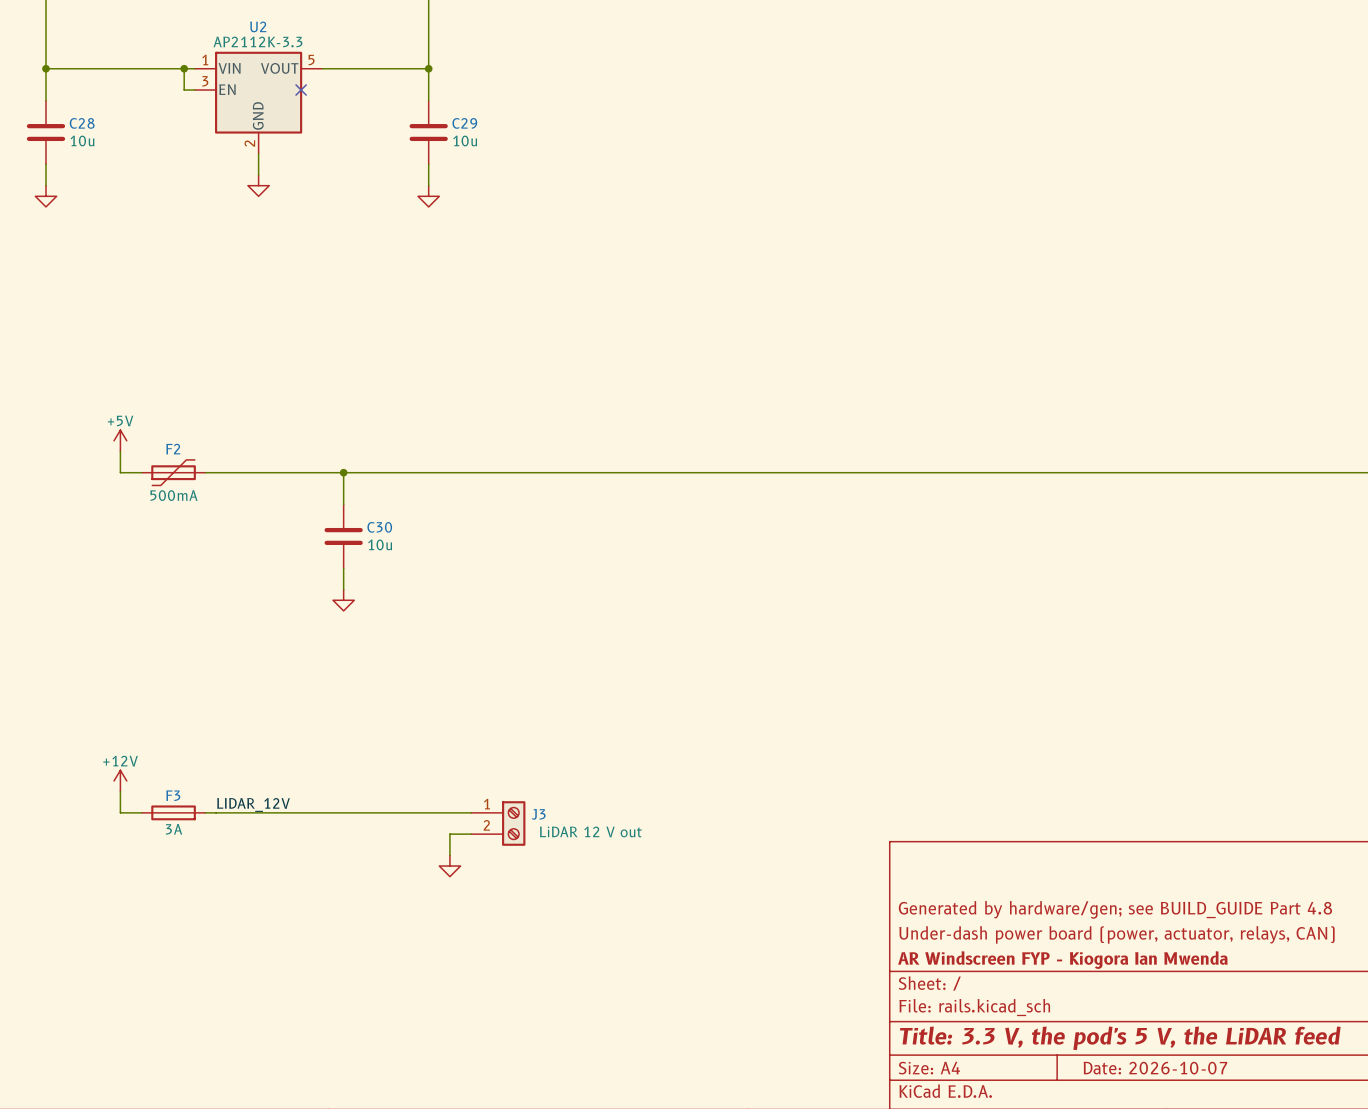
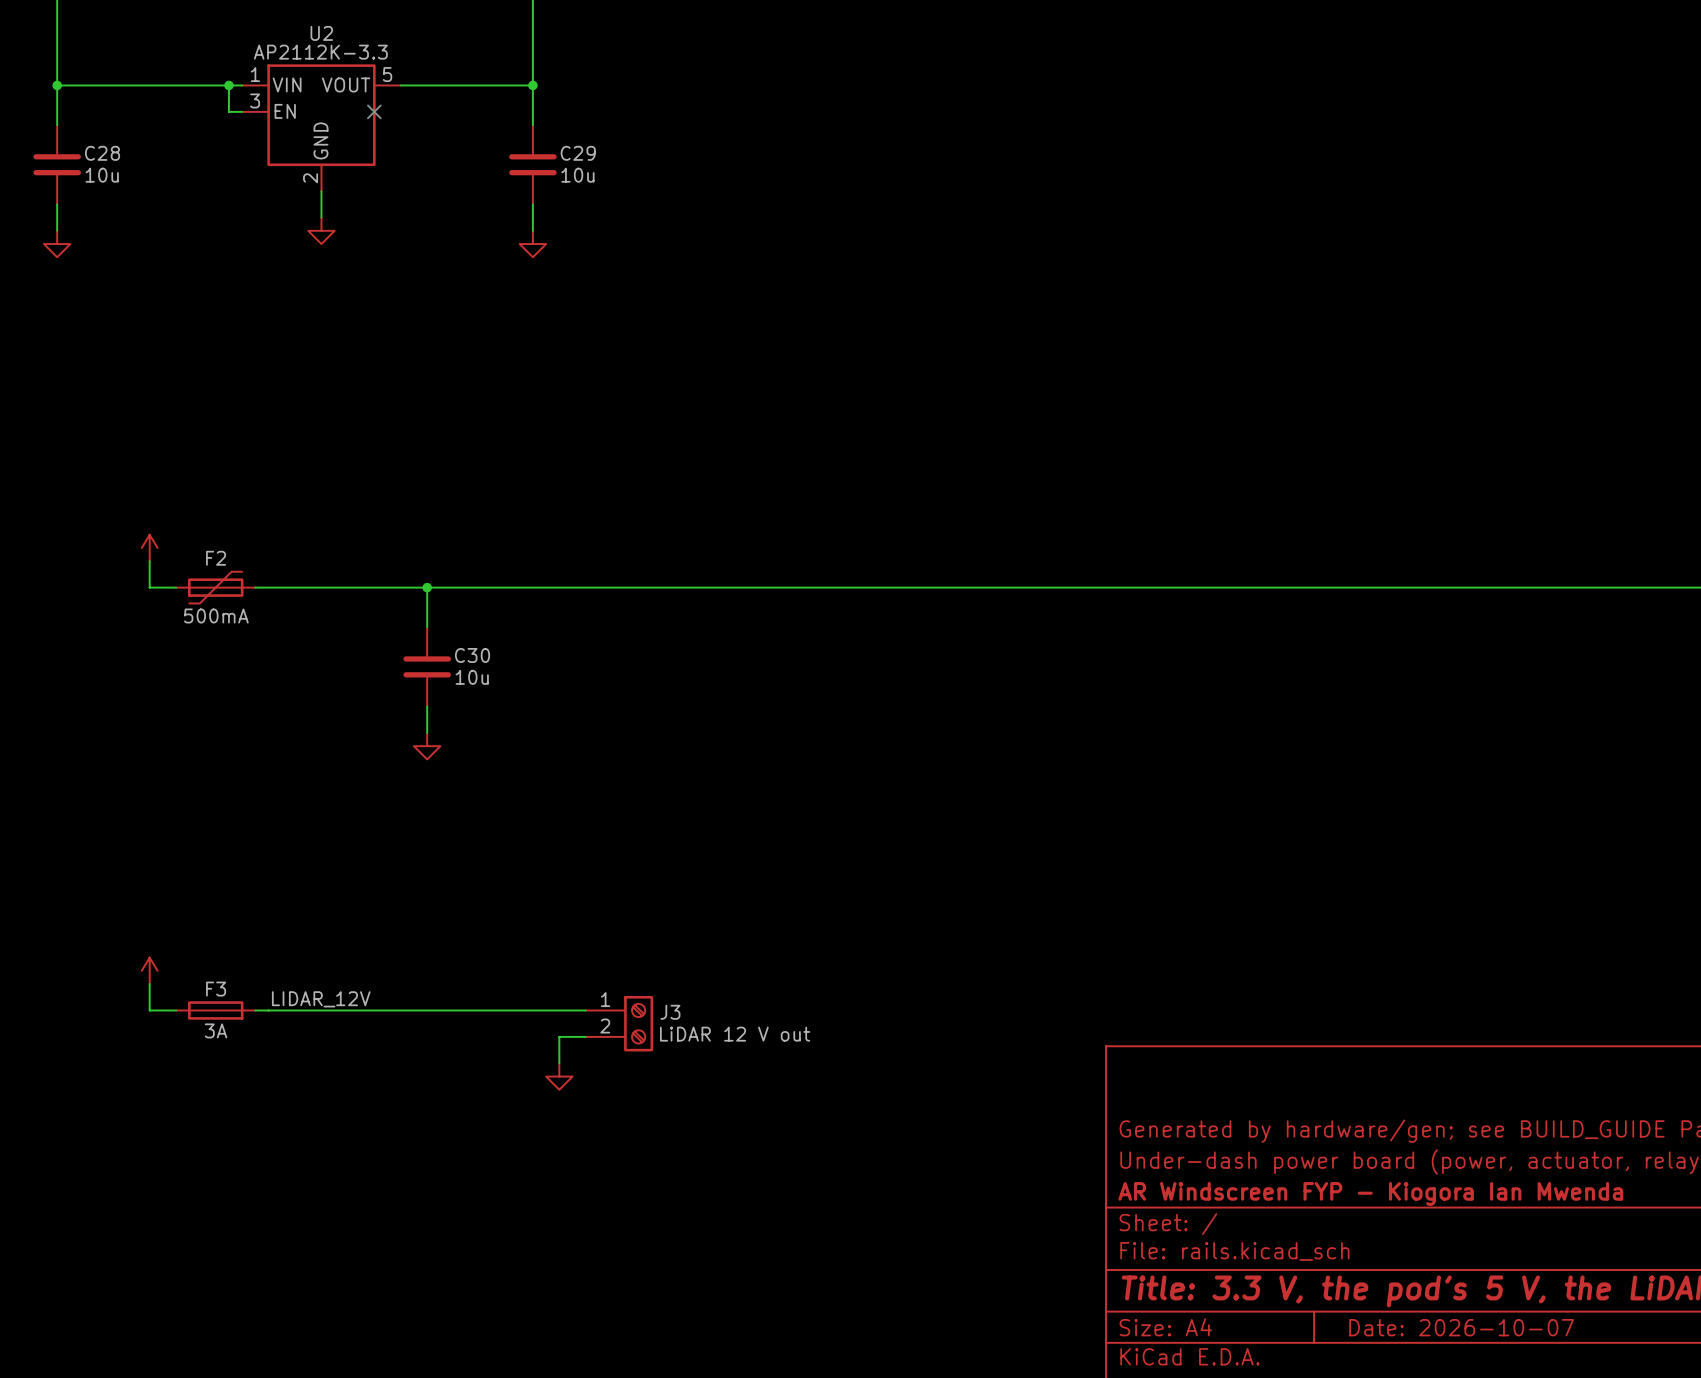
power symbol text: +5V (120, 420) -> none
power symbol text: +12V (120, 761) -> none

